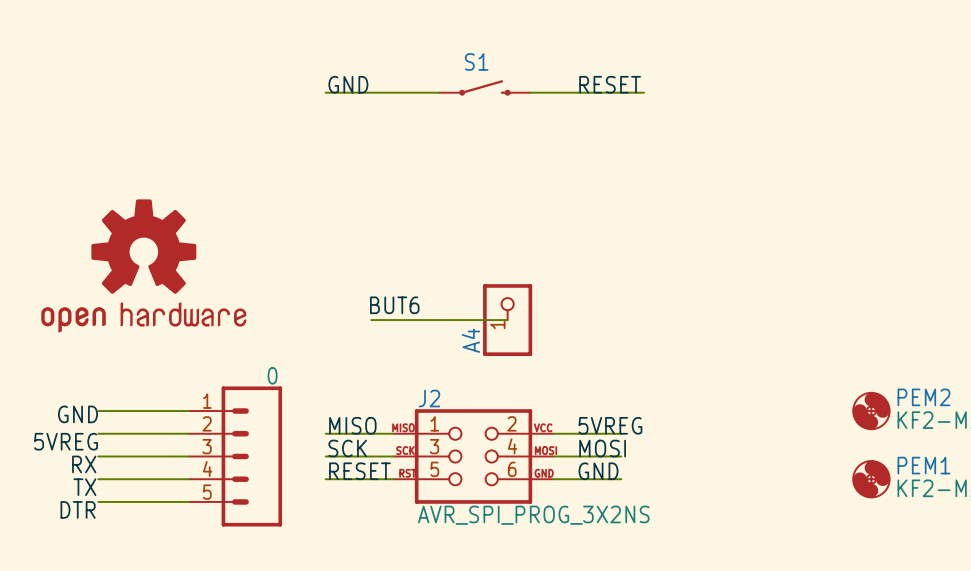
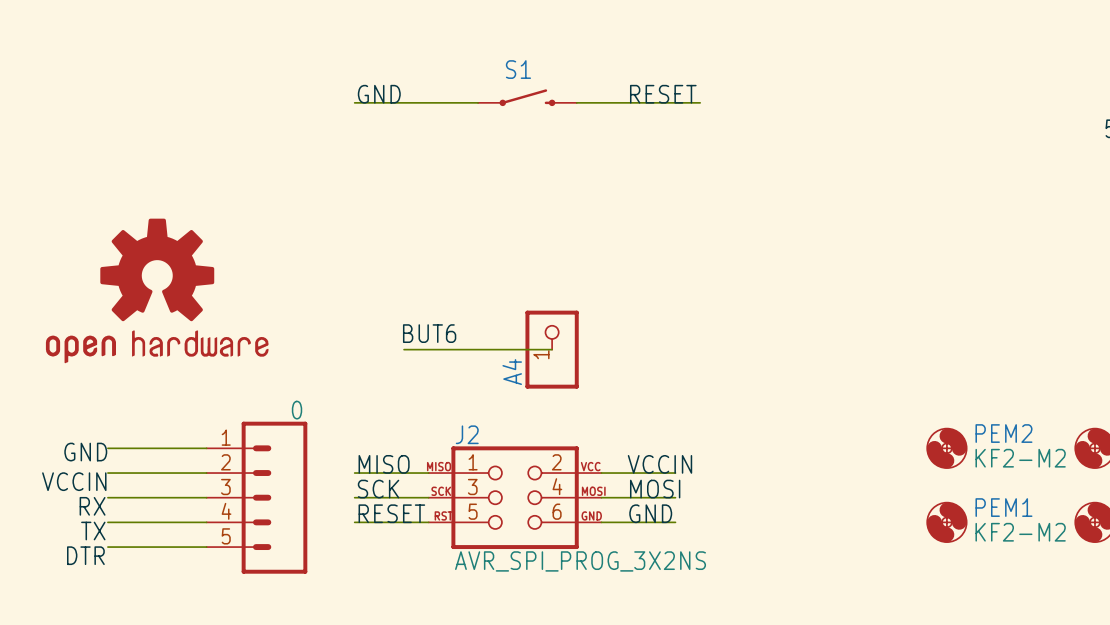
label: 5VREG (610, 425) -> VCCIN (659, 464)
label: 5VREG (66, 441) -> VCCIN (74, 481)

